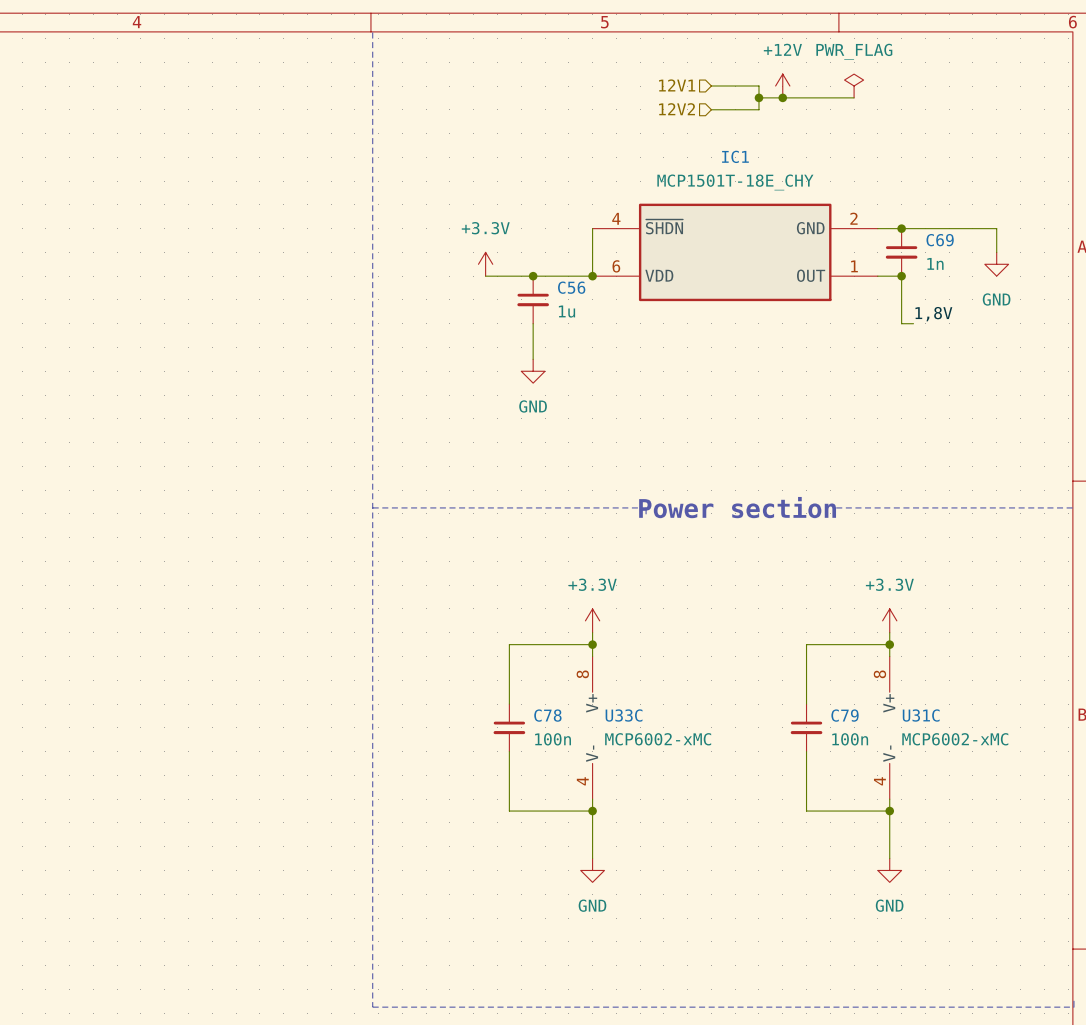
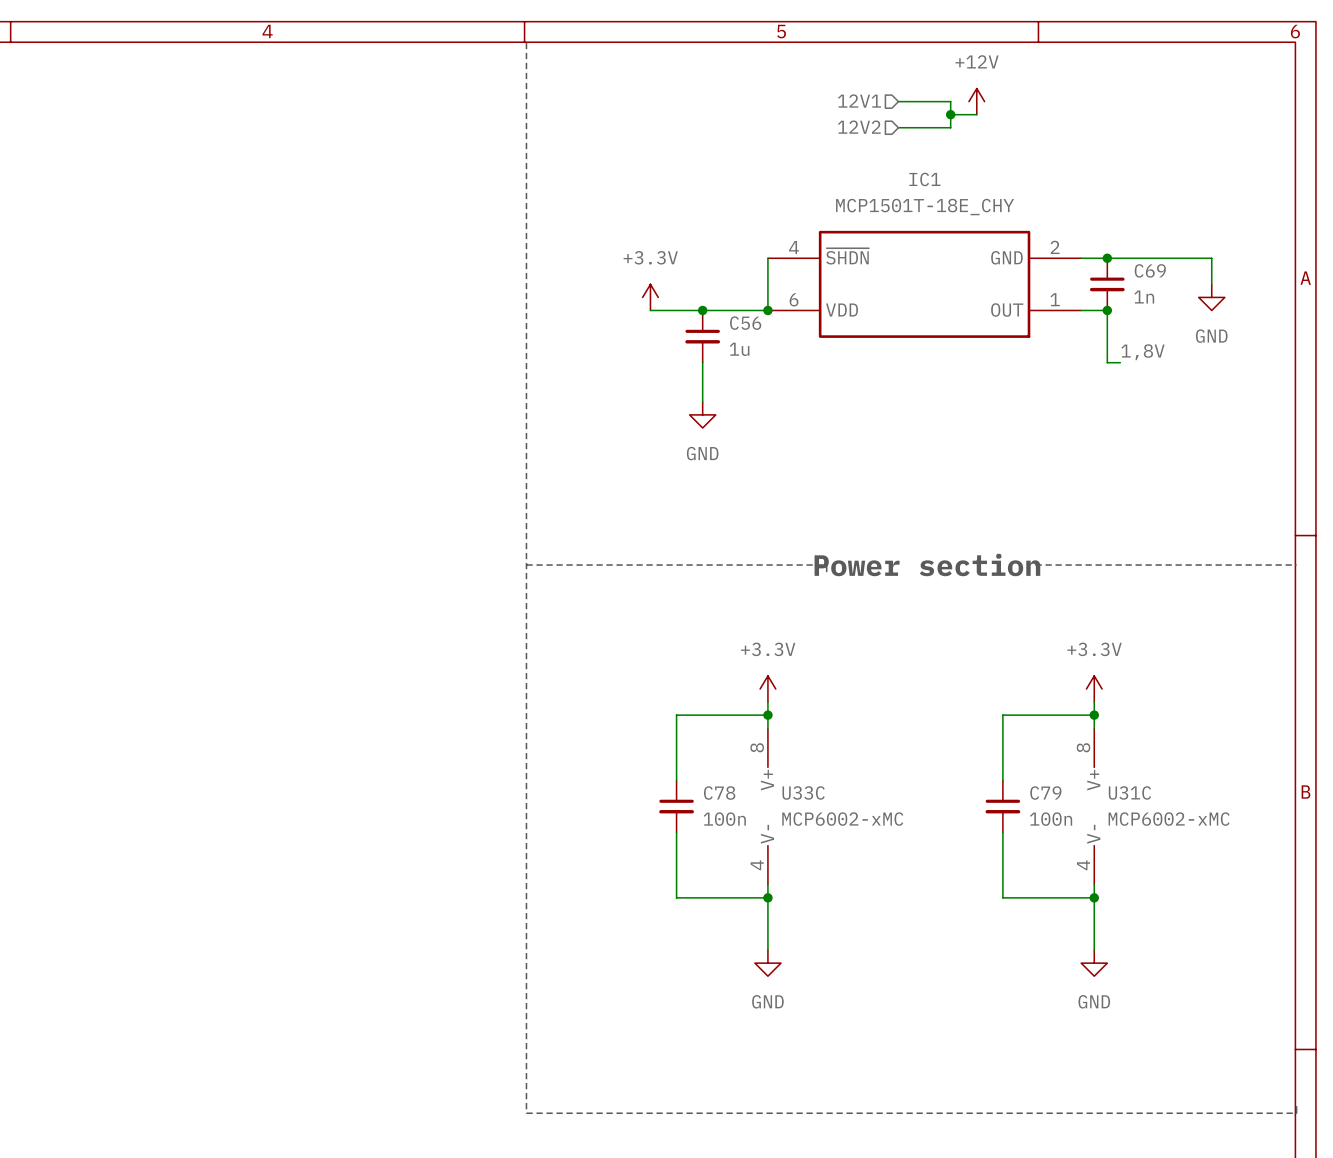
power symbol: PWR_FLAG (854, 86) -> none
wire: (782, 97) (854, 97) -> none
junction: (782, 97) -> none

